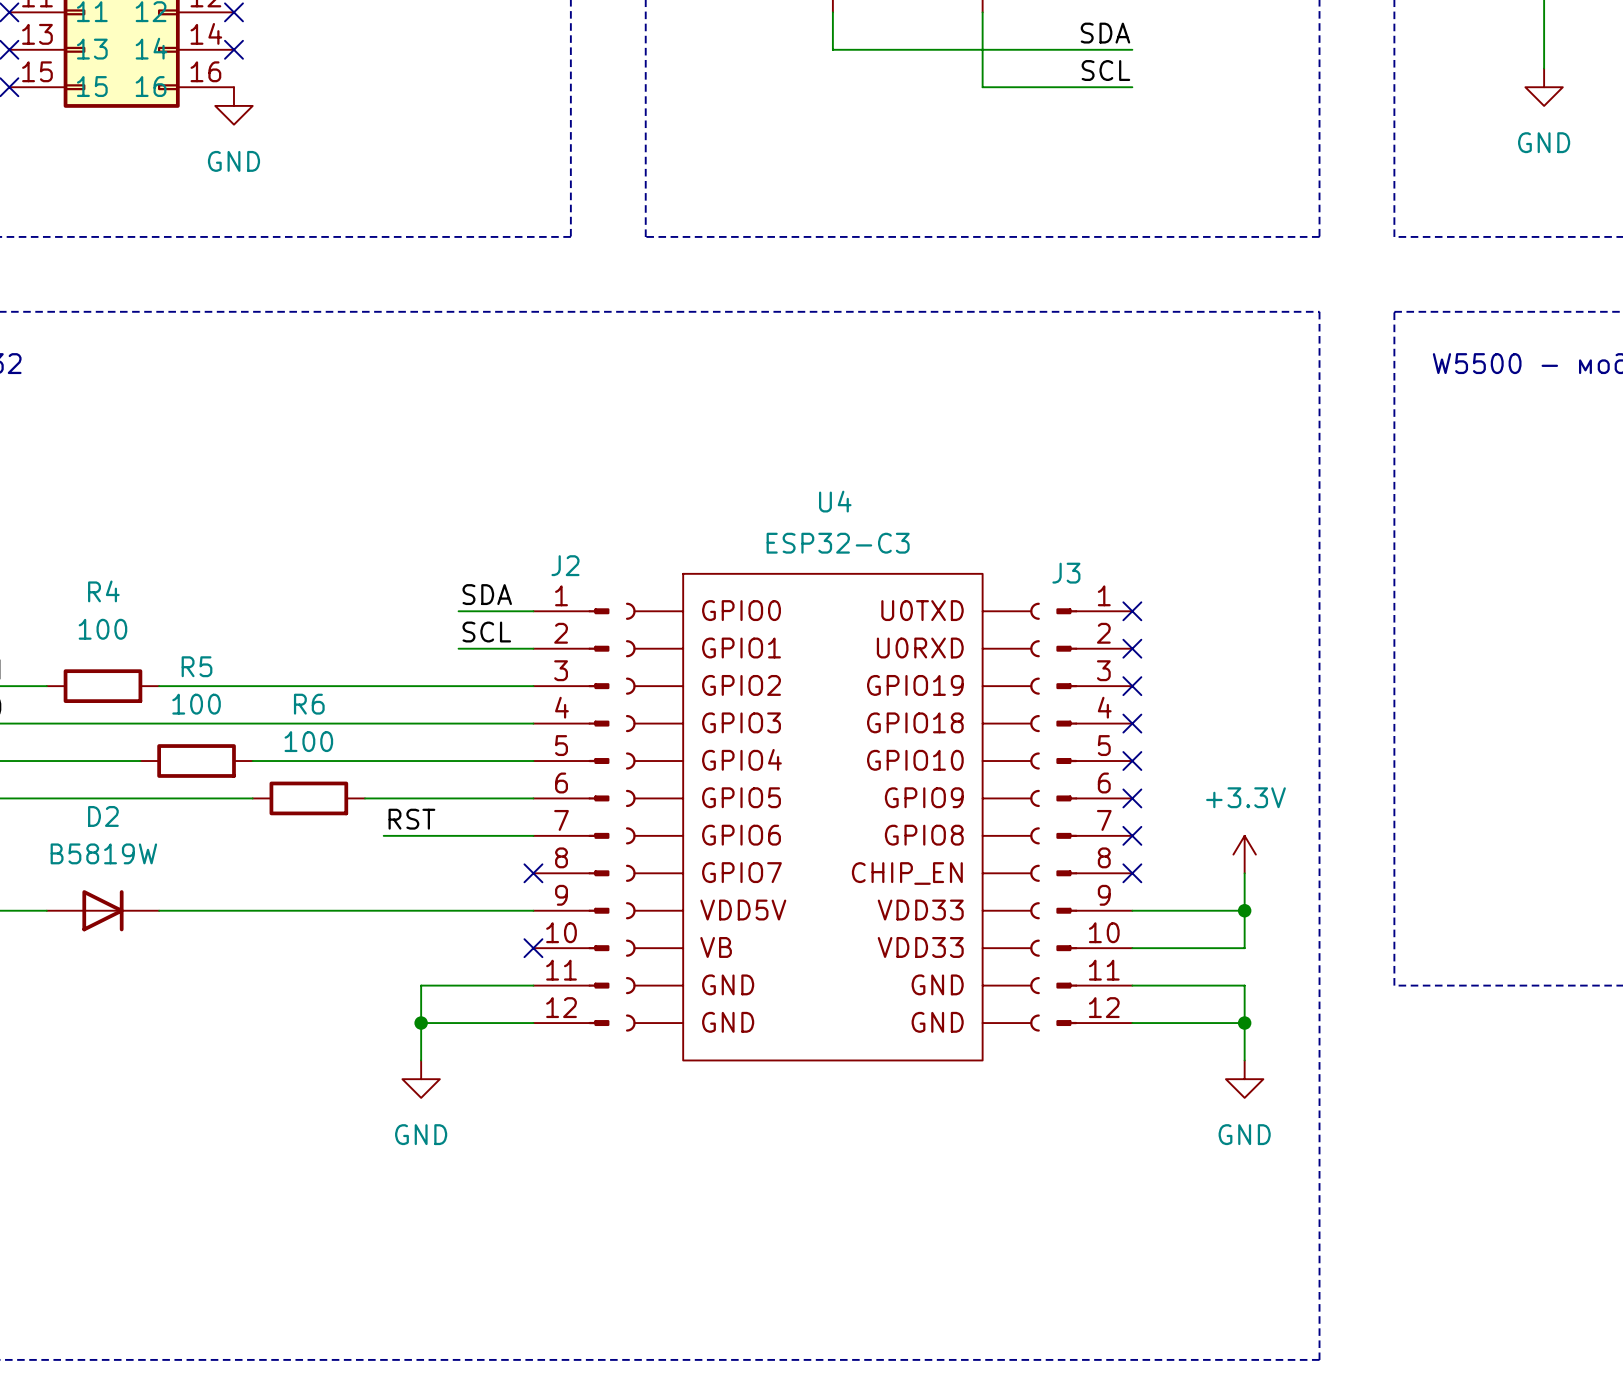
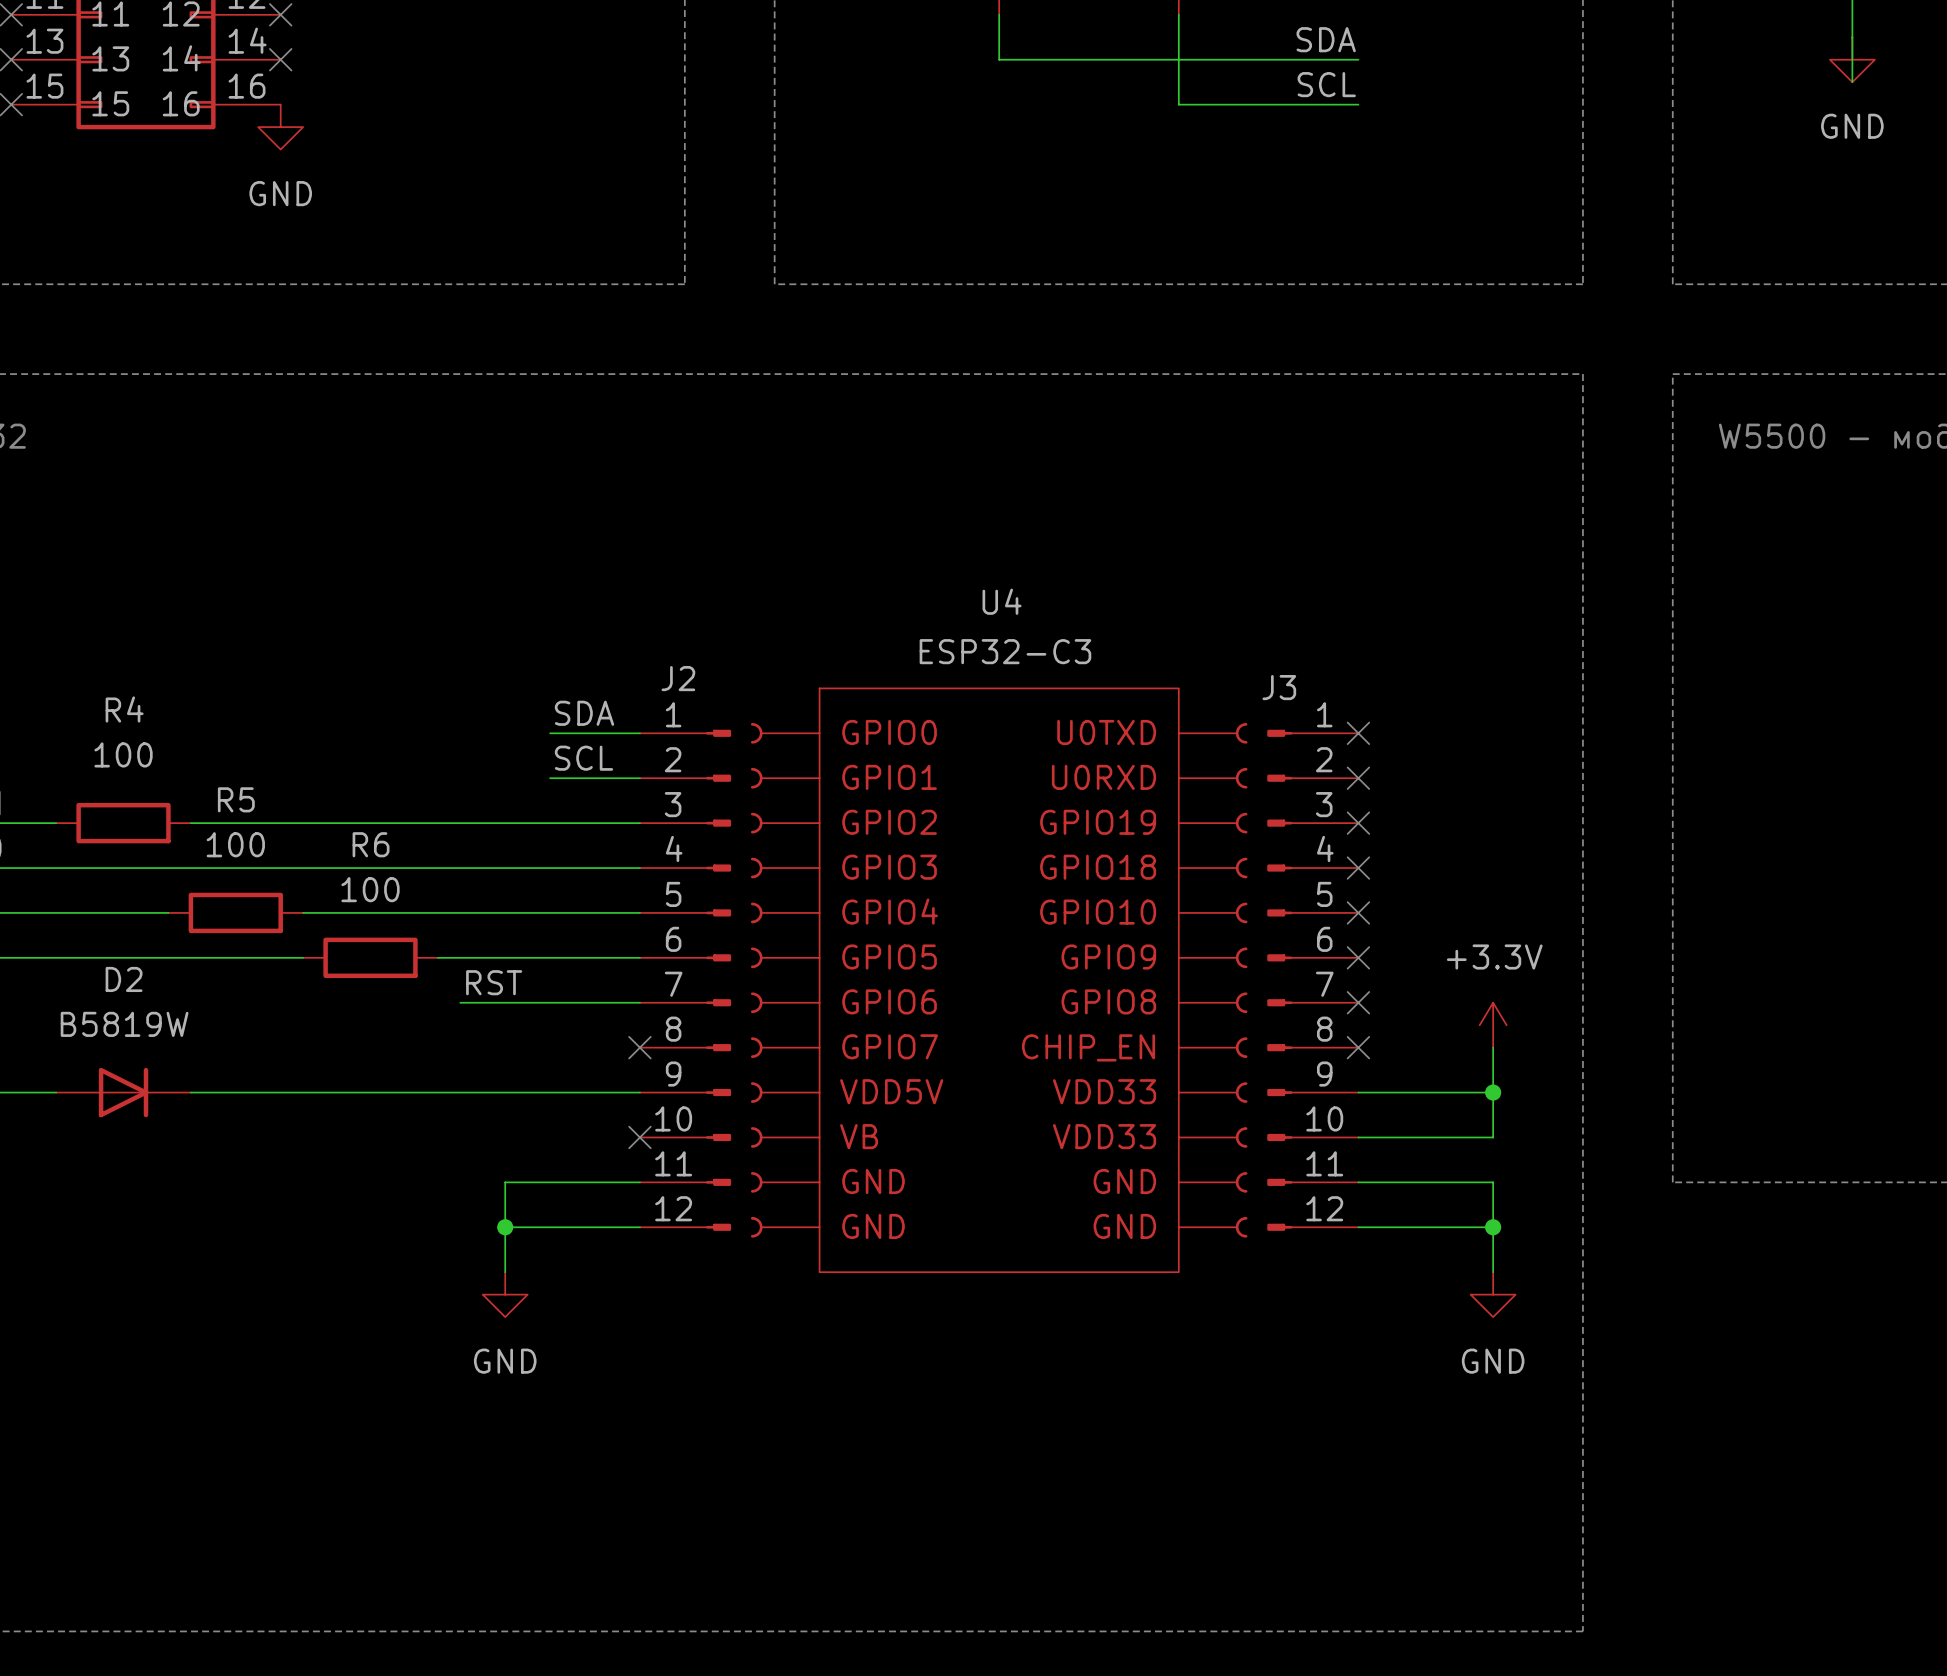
power symbol position: GND (1544, 87) -> GND (1852, 59)

